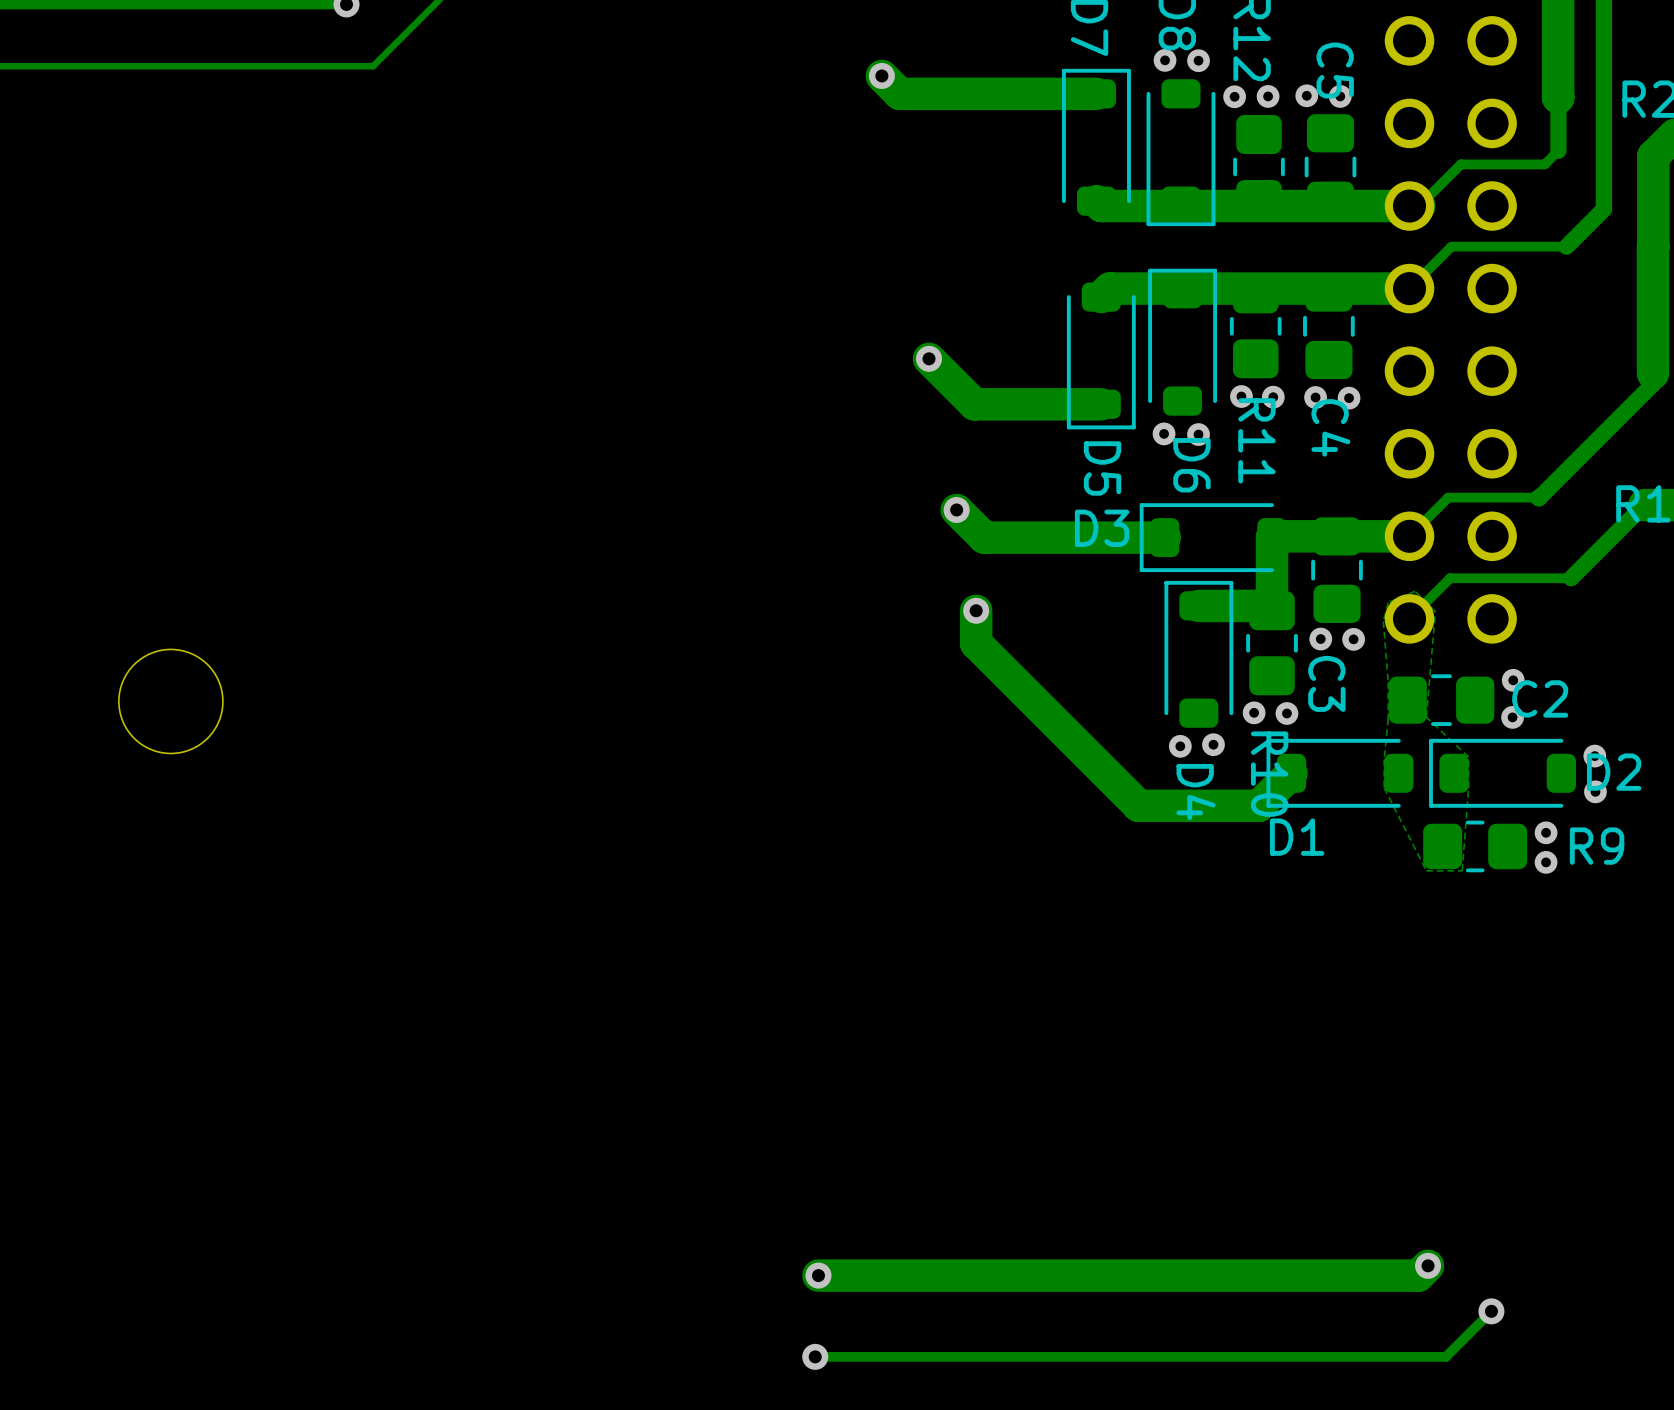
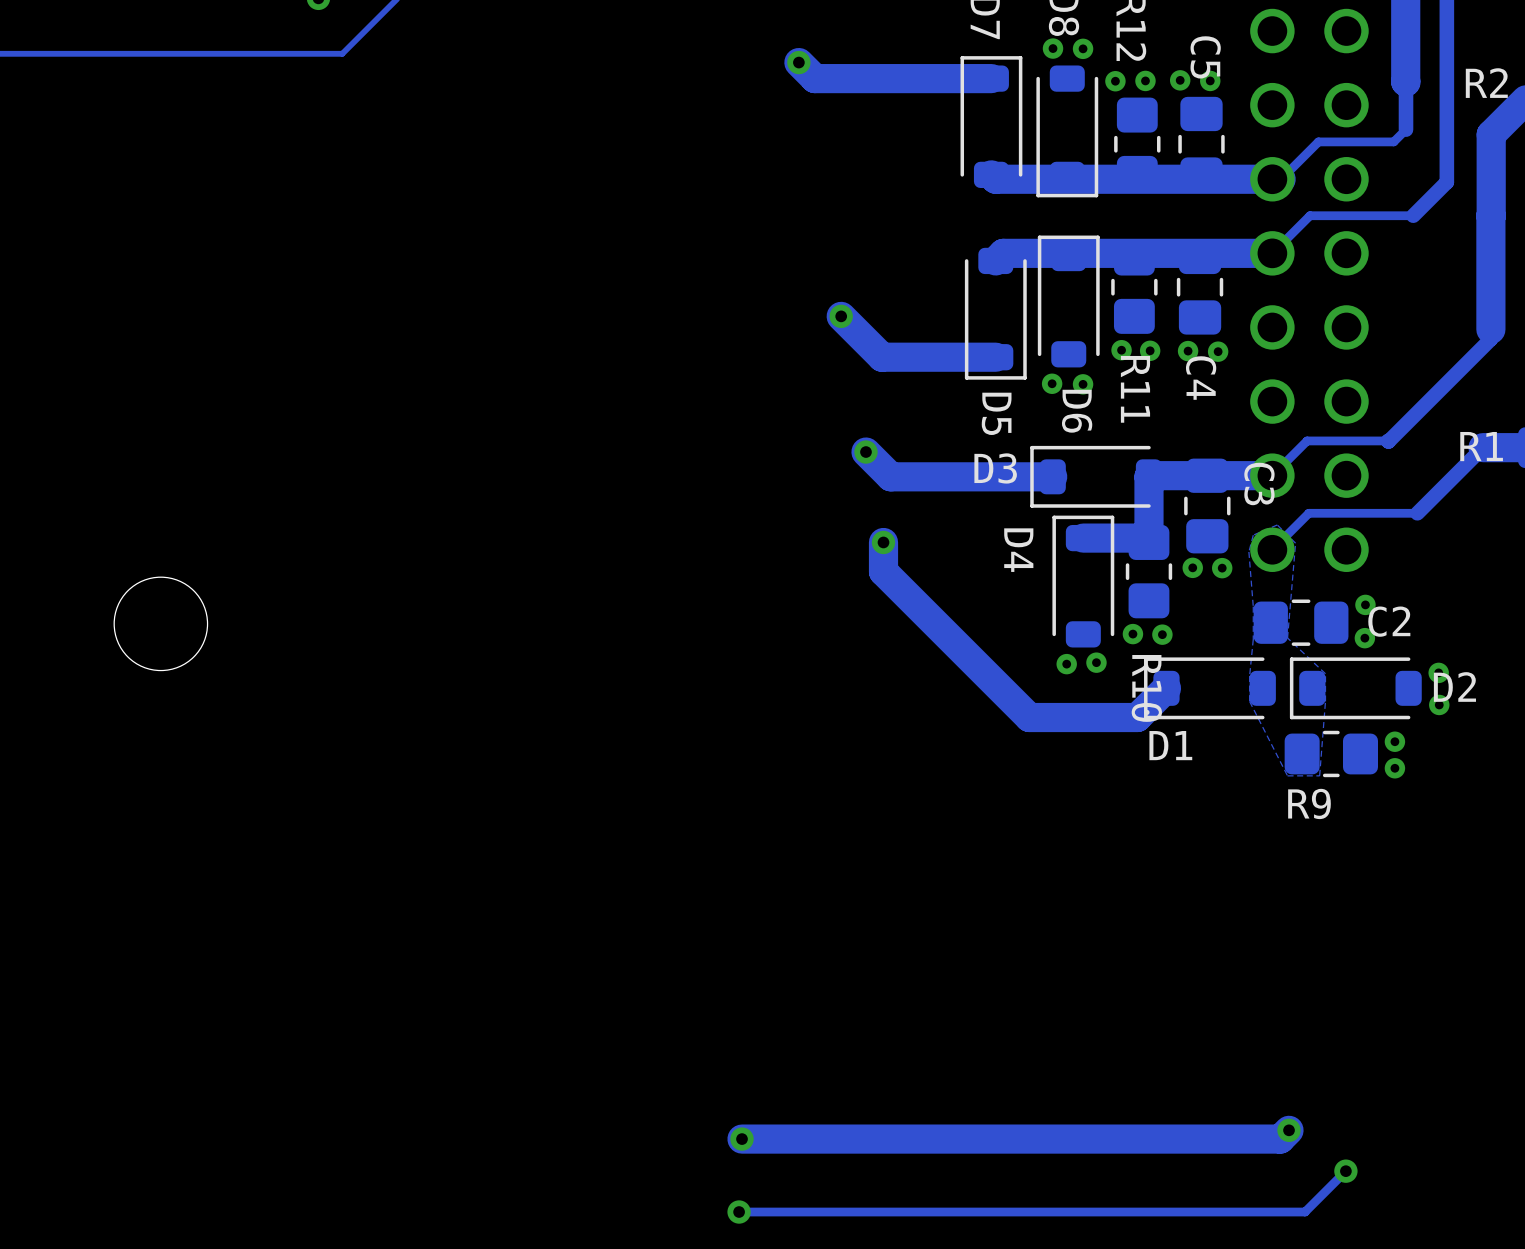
C3 name position: C3 (1326, 683) -> C3 (1259, 483)
D4 name position: D4 (1195, 791) -> D4 (1018, 550)
R9 name position: R9 (1597, 846) -> R9 (1309, 803)

